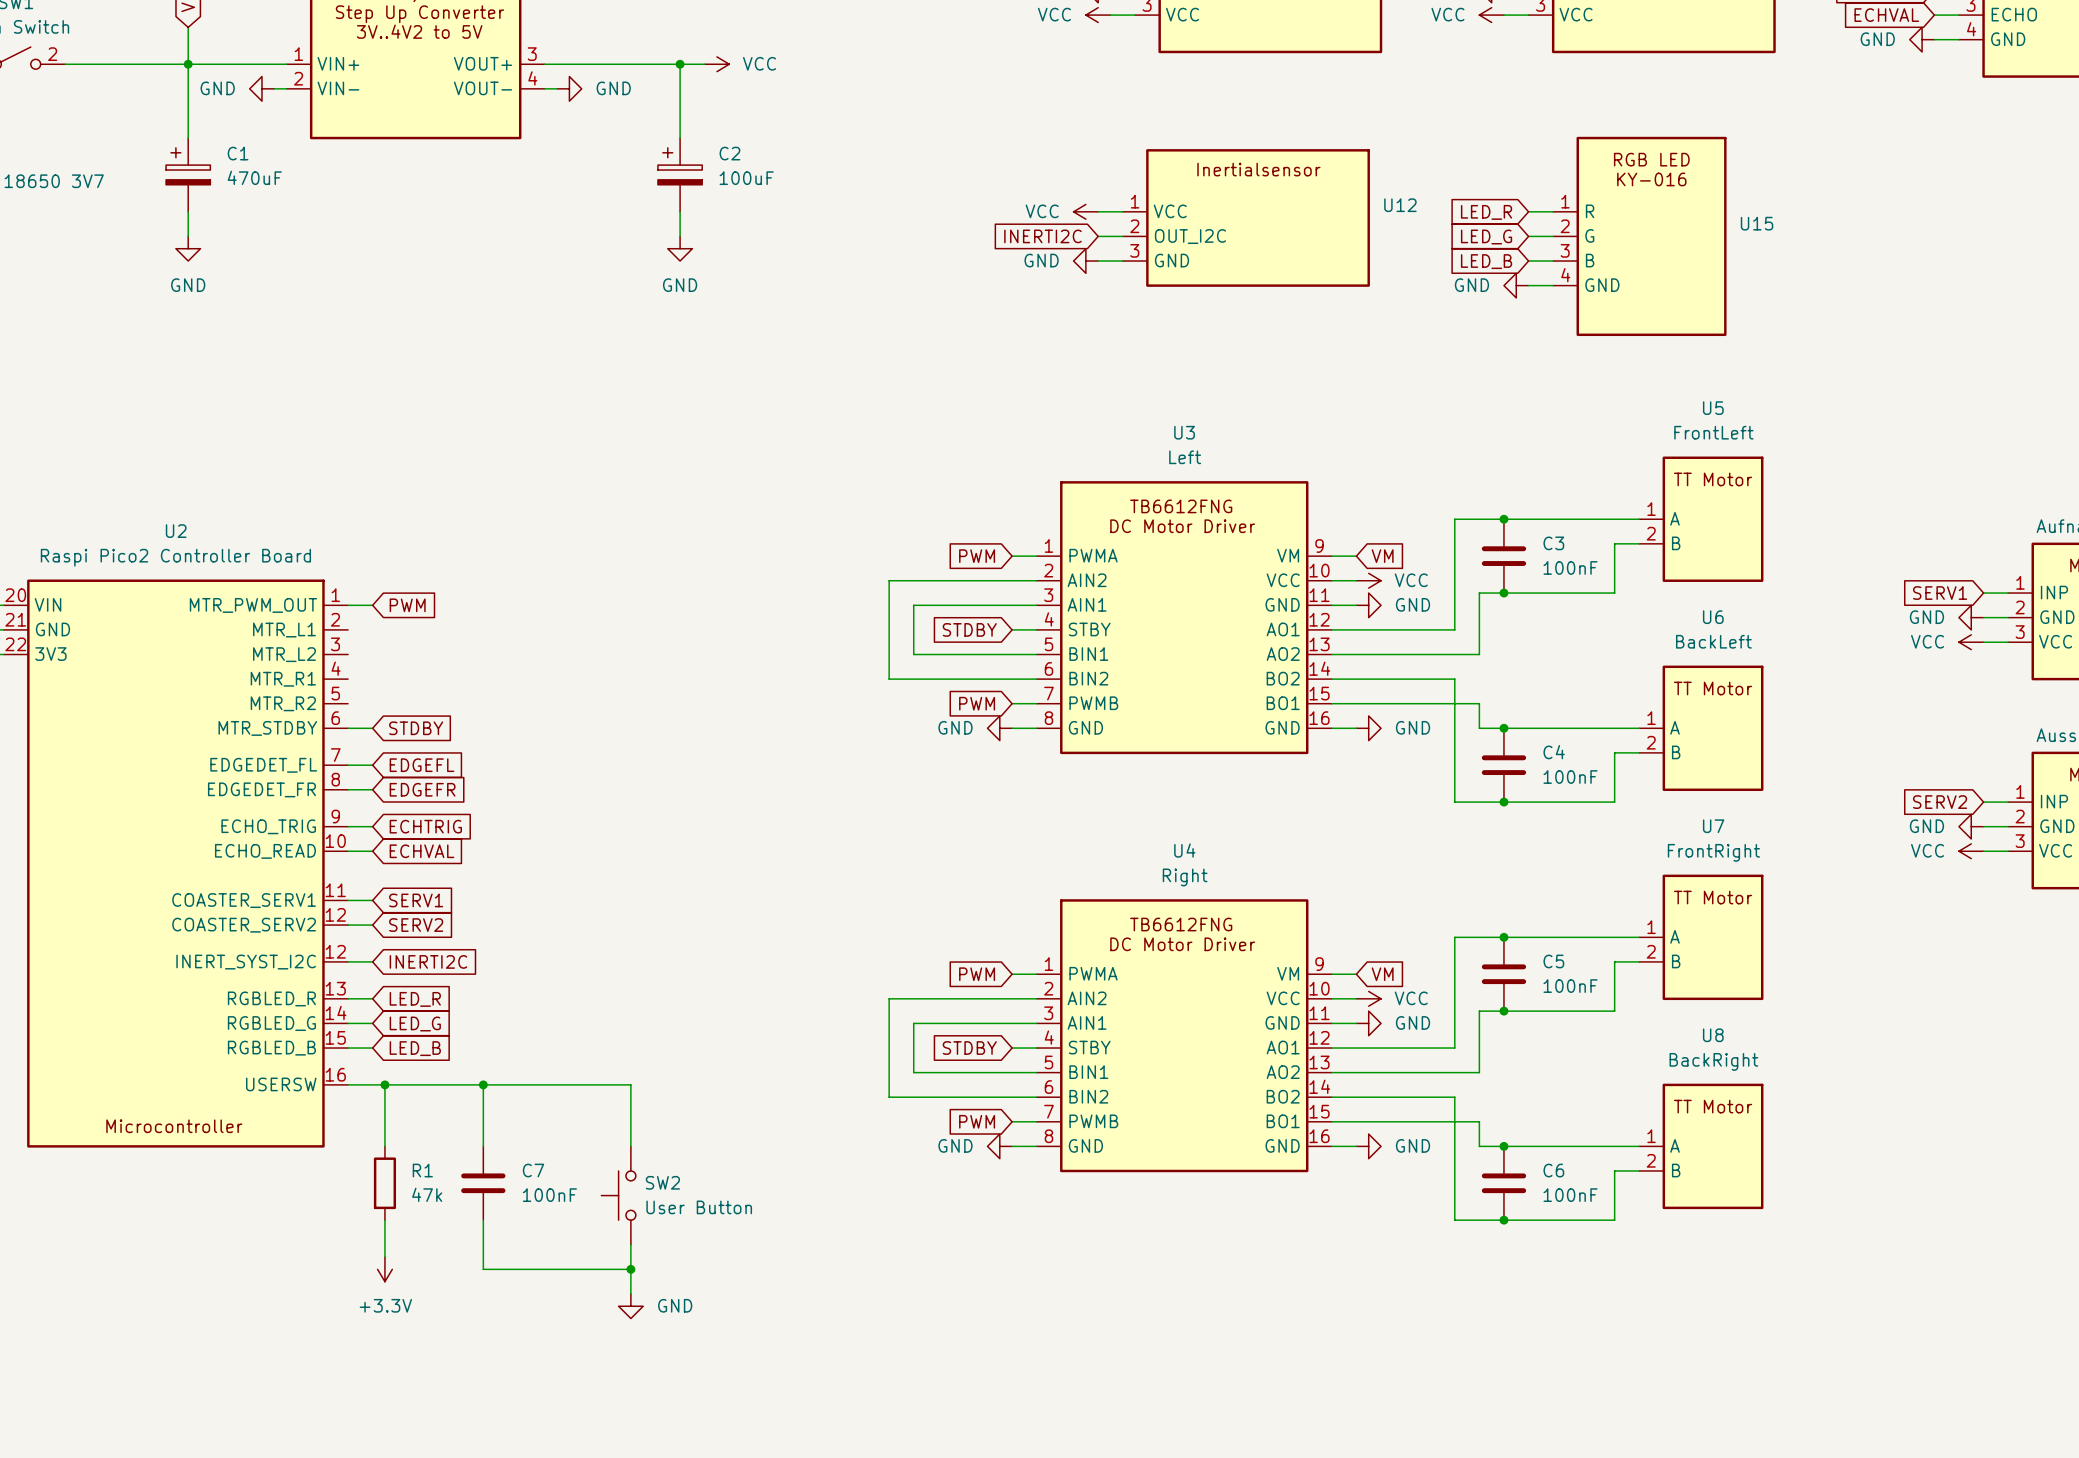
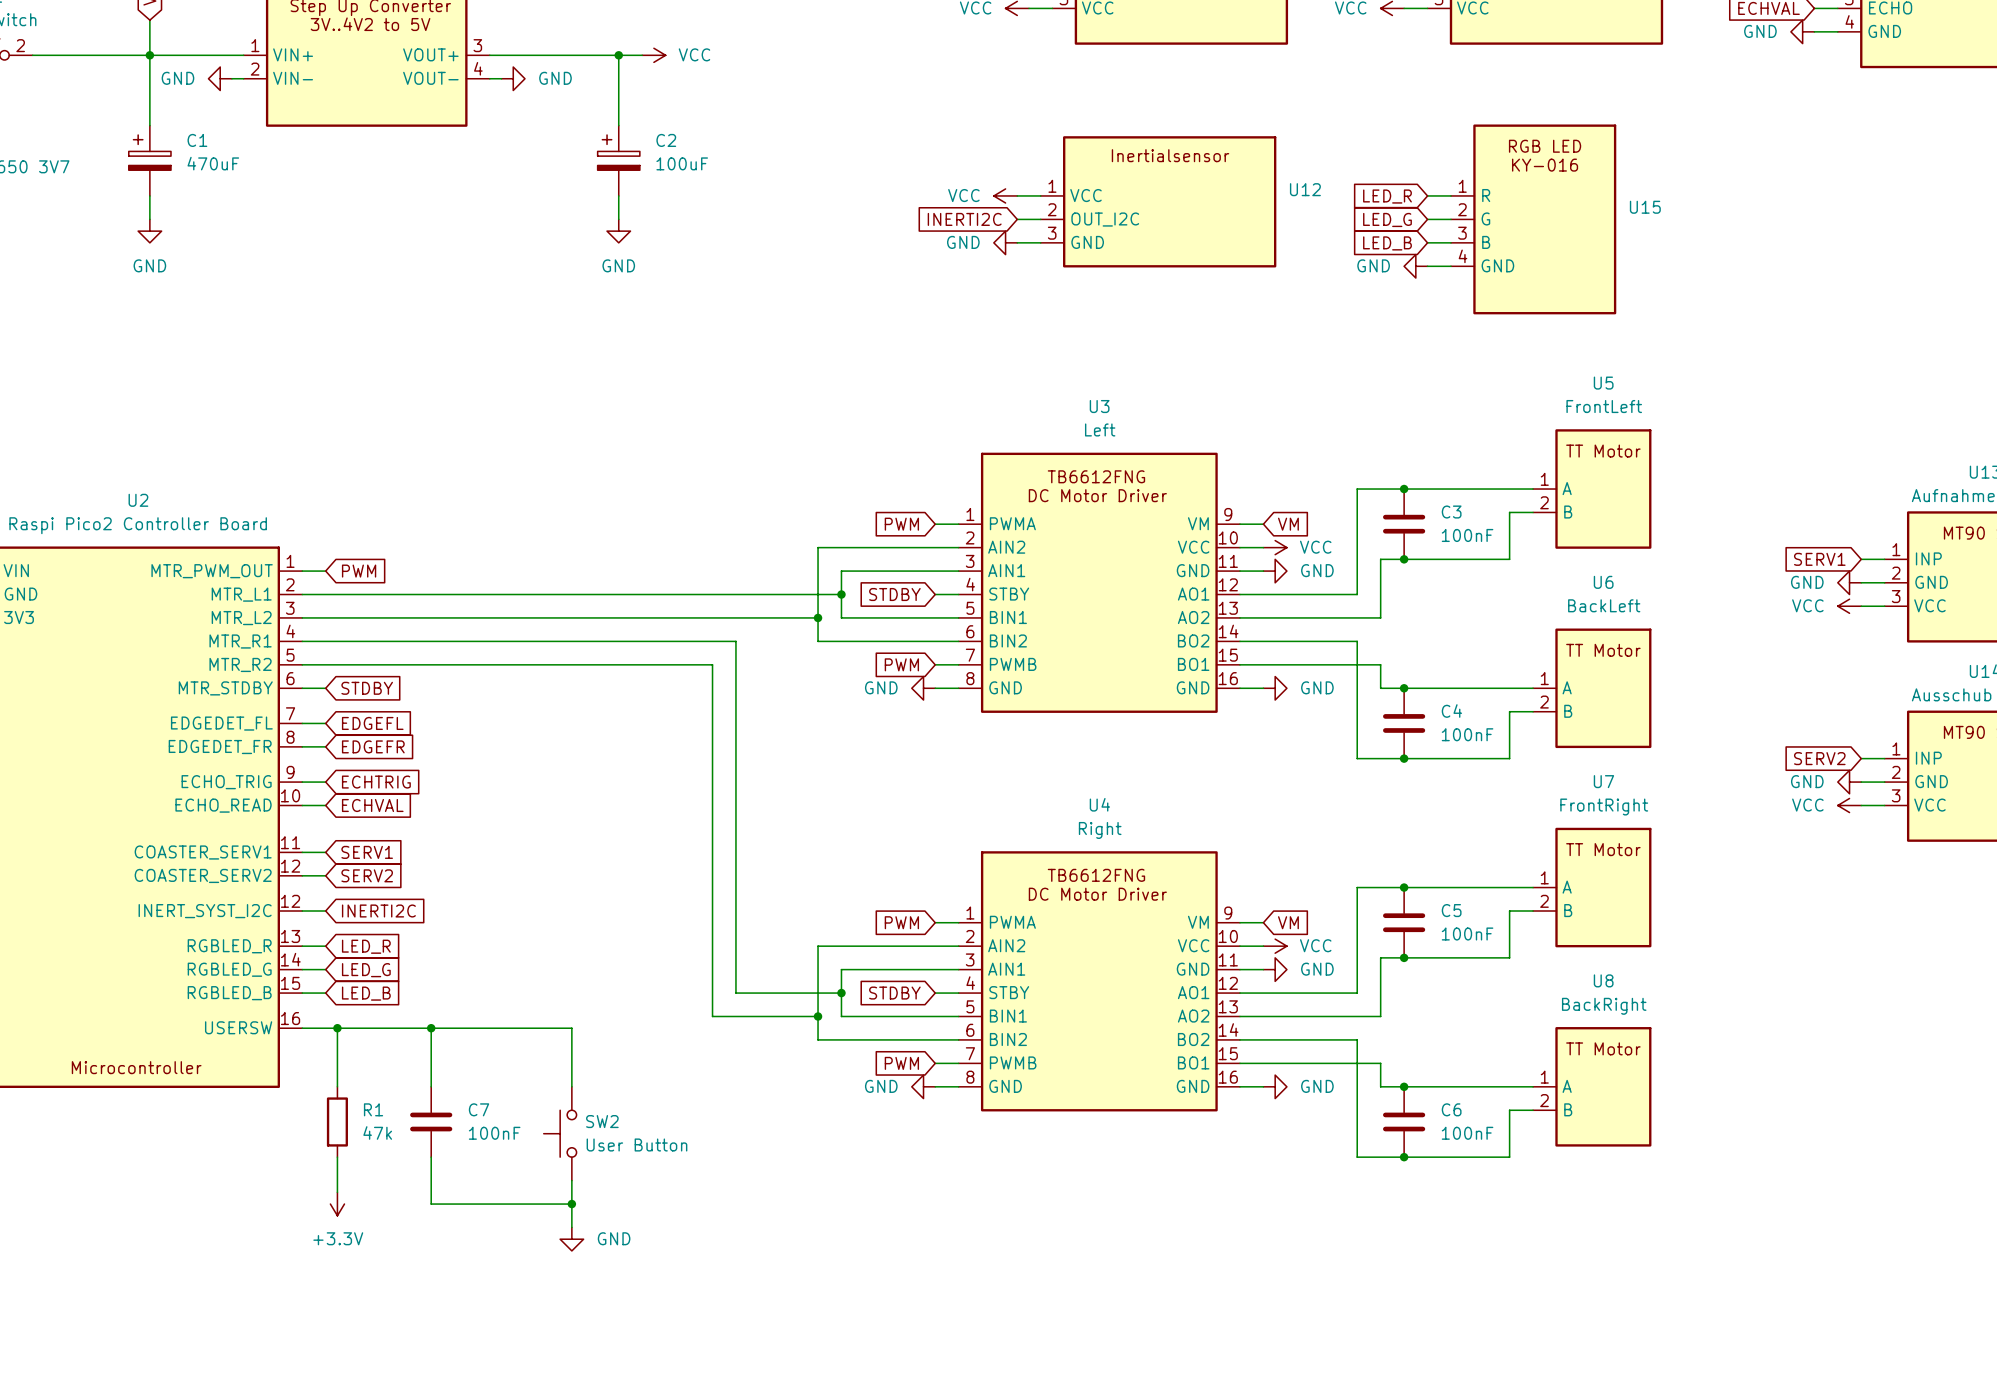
wire: none -> (302, 594) (841, 594)
junction: none -> (841, 594)
wire: none -> (302, 617) (818, 617)
junction: none -> (818, 617)
wire: none -> (302, 641) (735, 641) (735, 993) (841, 993)
wire: none -> (302, 664) (712, 664) (712, 1016) (818, 1016)
junction: none -> (841, 993)
junction: none -> (818, 1016)

